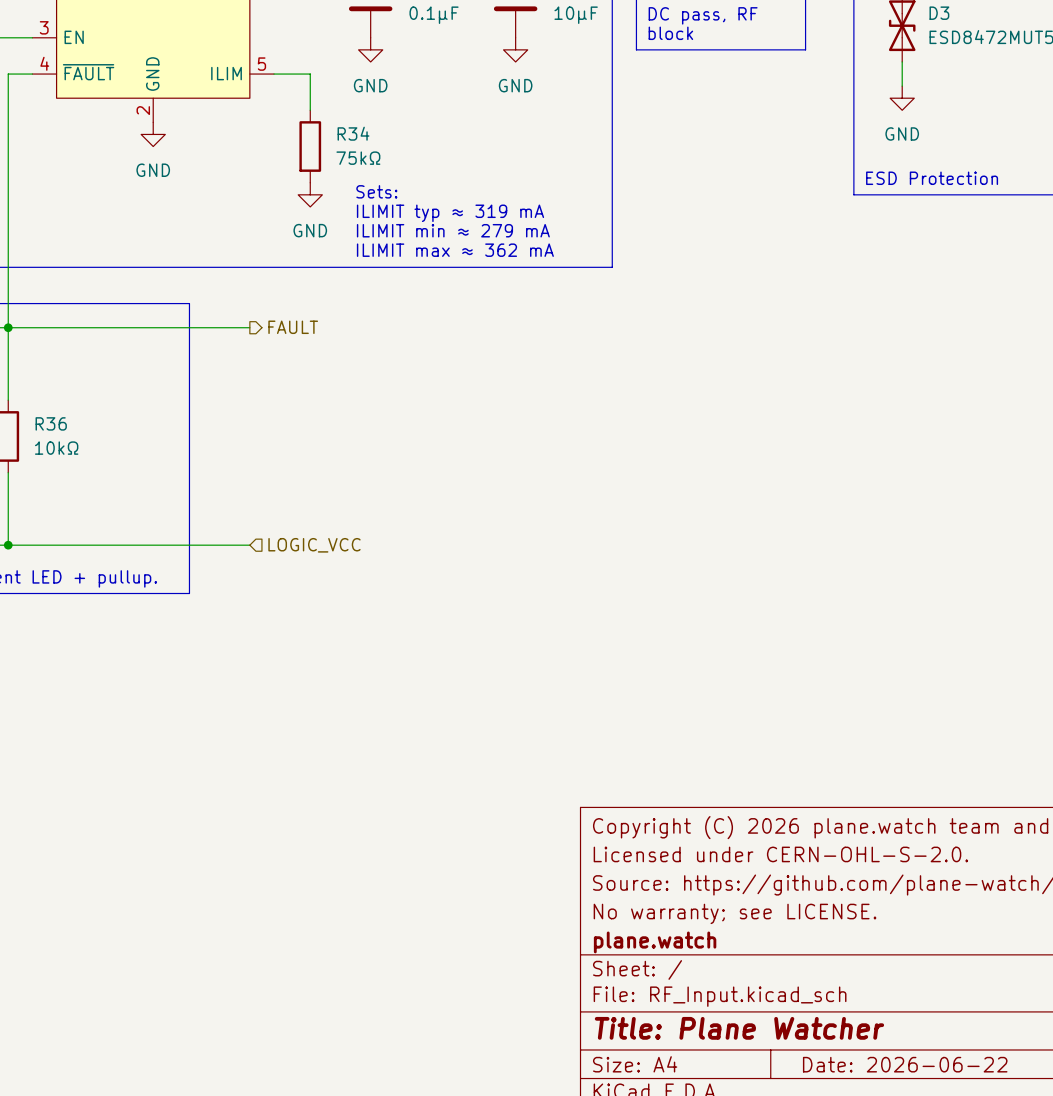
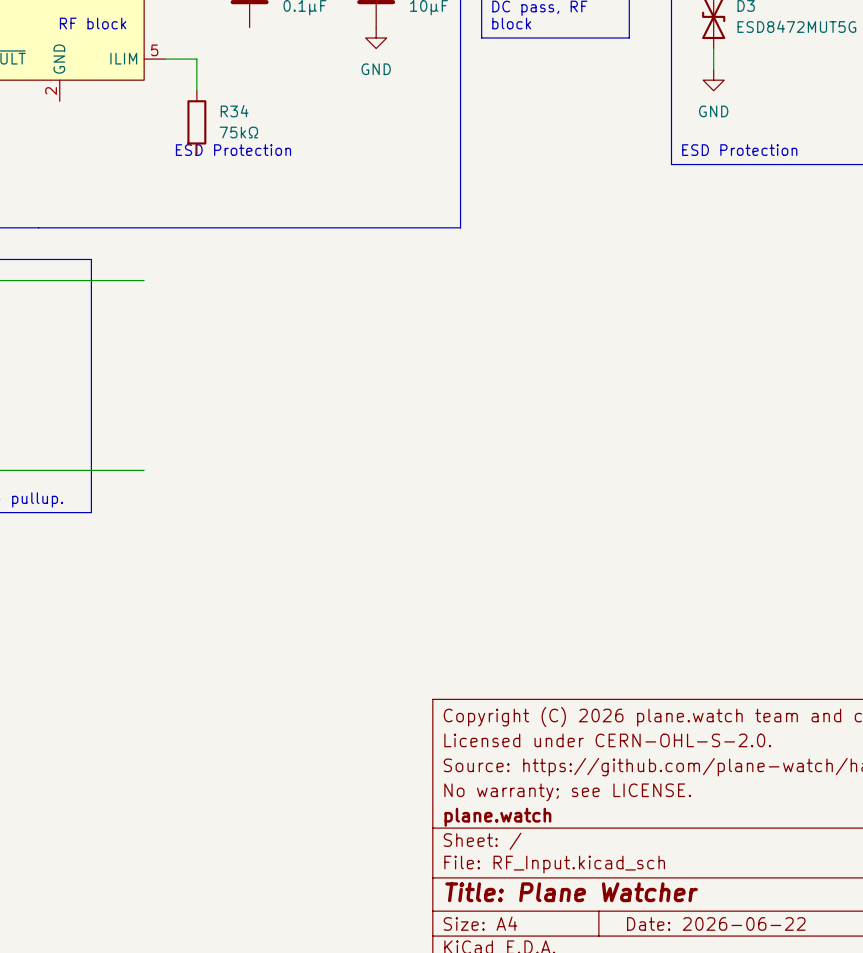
text: none -> RF block (93, 23)
power symbol: GND (370, 49) -> none
power symbol: GND (153, 134) -> none
text: none -> ESD Protection (233, 150)
text: Sets: (376, 191) -> none
power symbol: GND (310, 194) -> none
text: ILIMIT typ ≈ 319 mA (450, 213) -> none
text: ILIMIT min ≈ 279 mA (453, 230) -> none
text: ILIMIT max ≈ 362 mA (455, 250) -> none
hierarchical label: FAULT (293, 327) -> none
hierarchical label: LOGIC_VCC (314, 545) -> none

